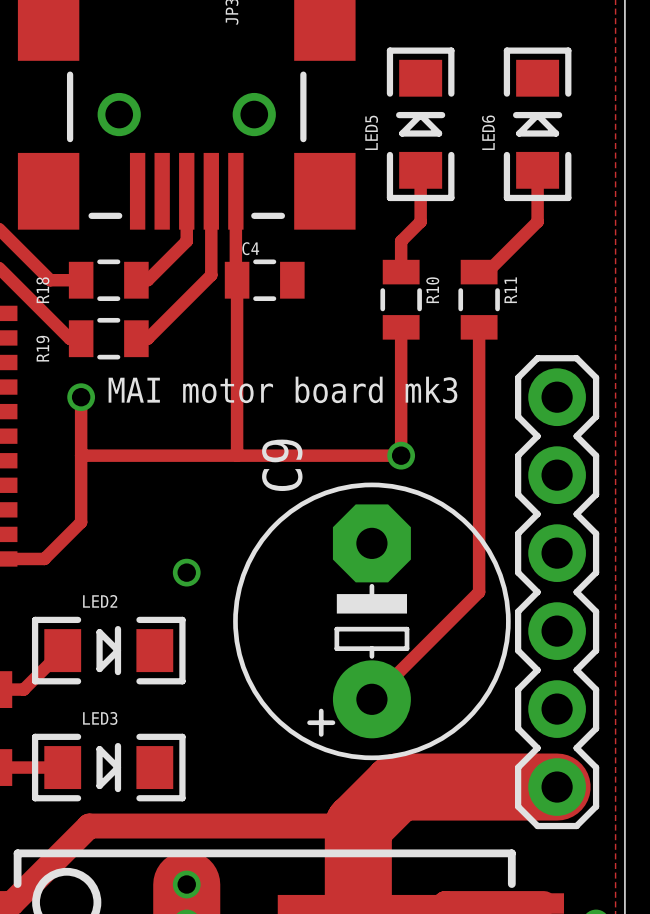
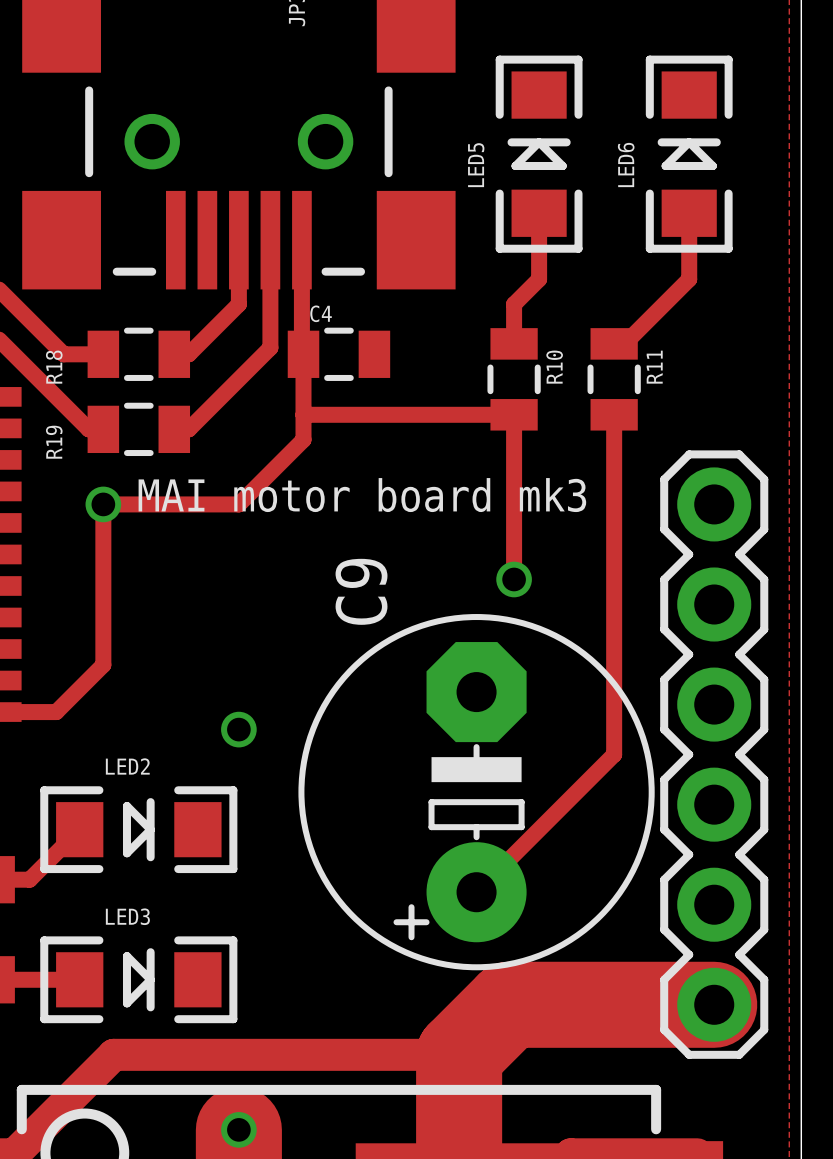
track: none -> (303, 414) (514, 414)
track: (237, 346) (237, 455) -> (303, 439) (238, 504) (103, 504)
track: (81, 455) (401, 455) -> none

